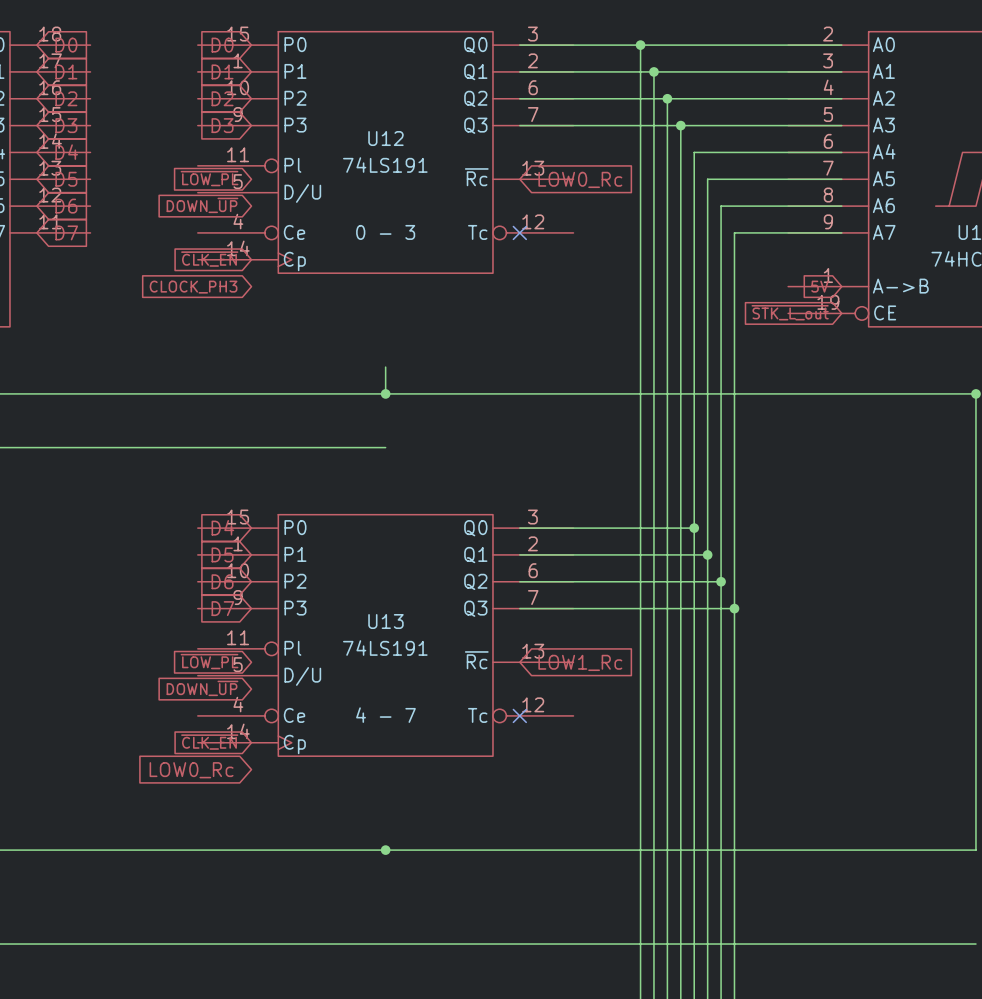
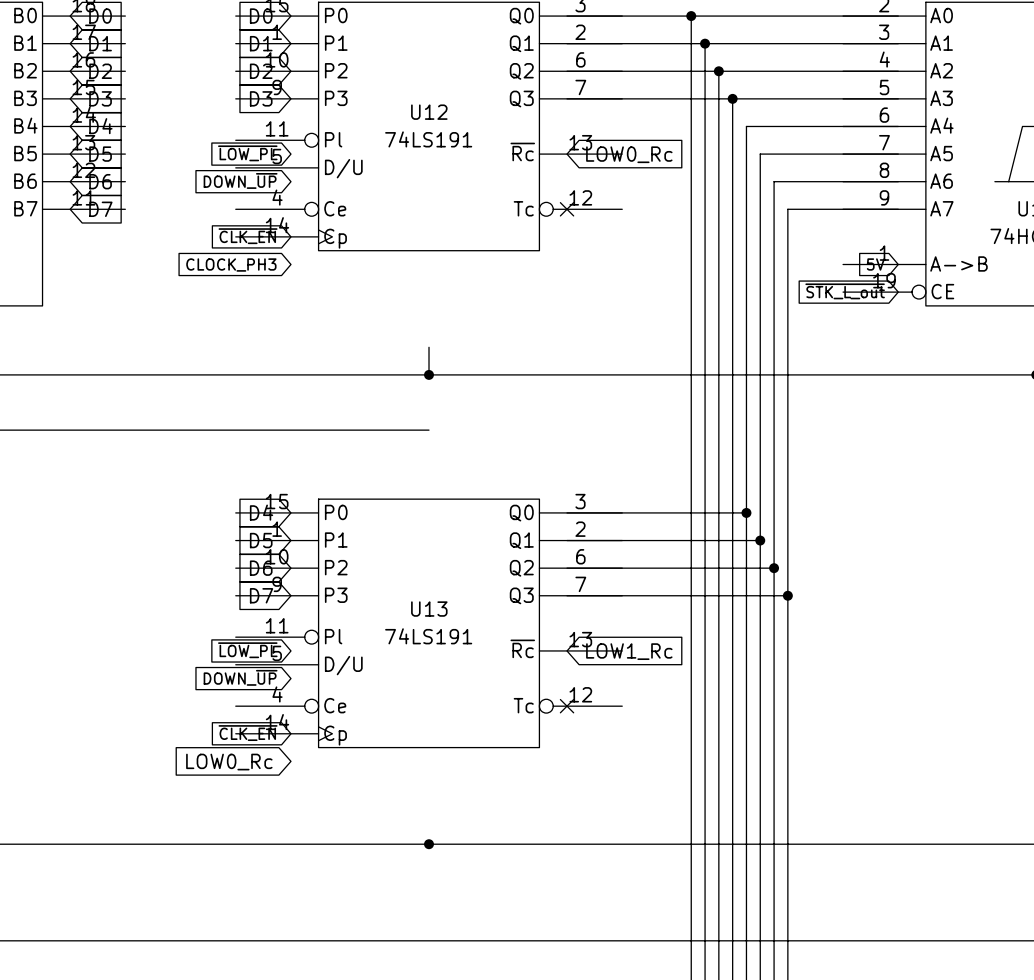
U12 text: 0 - 3 (385, 232) -> none
U13 text: 4 - 7 (385, 715) -> none

